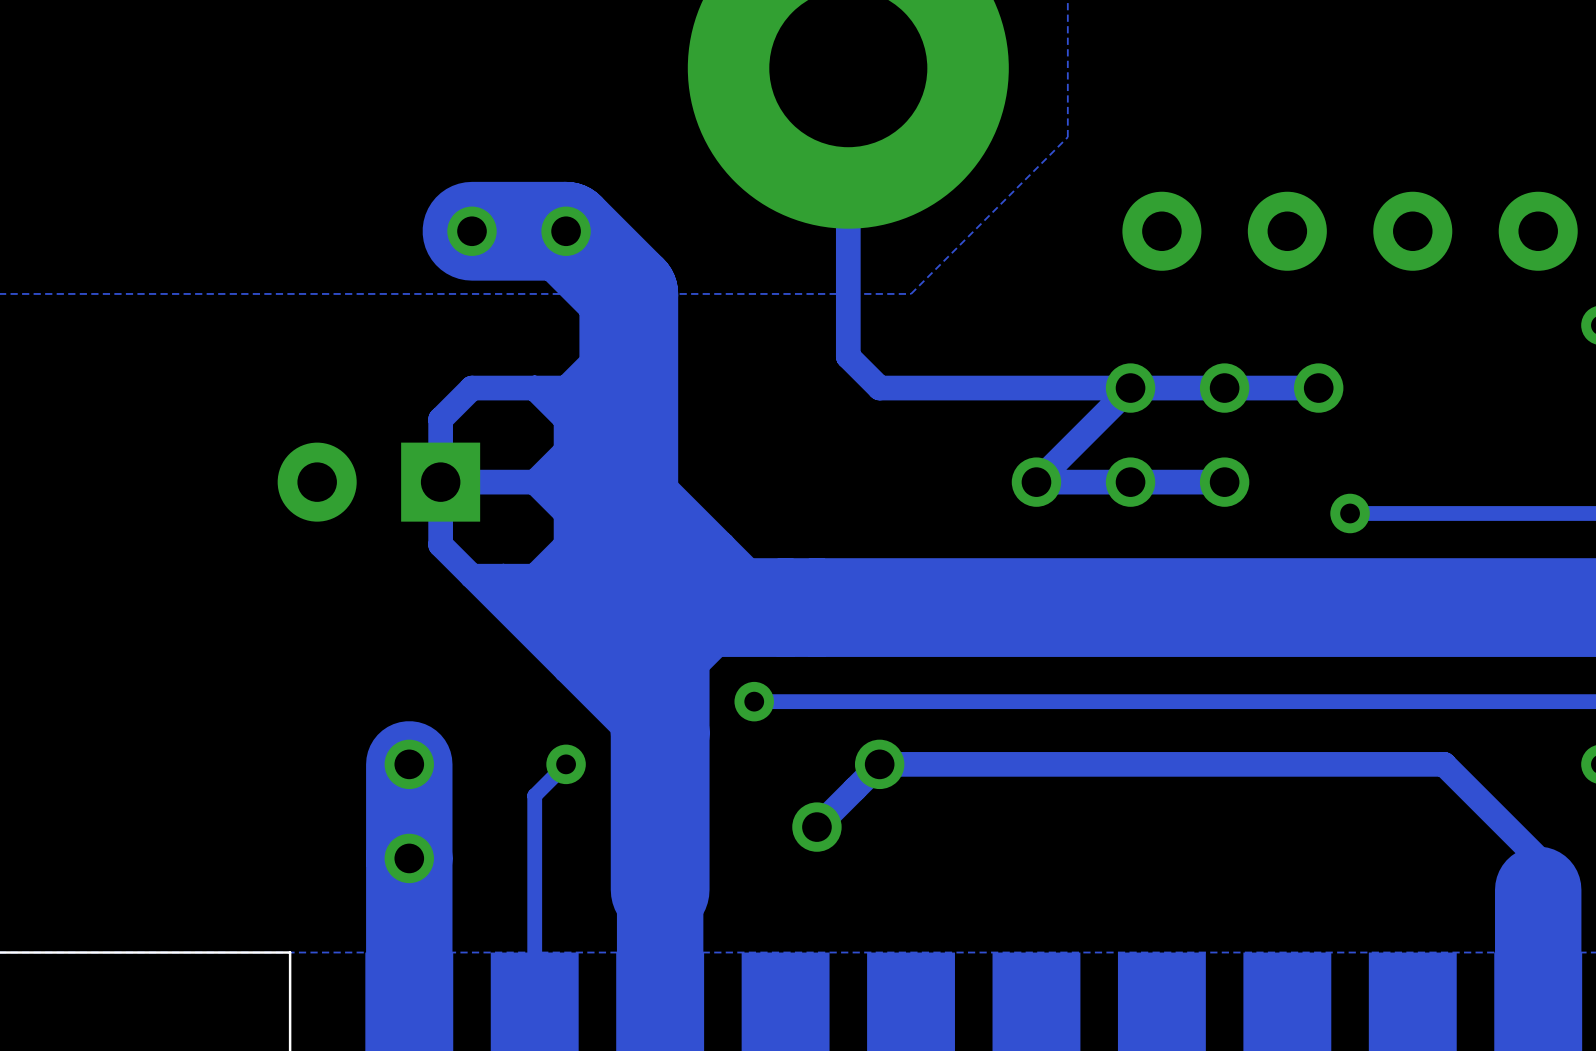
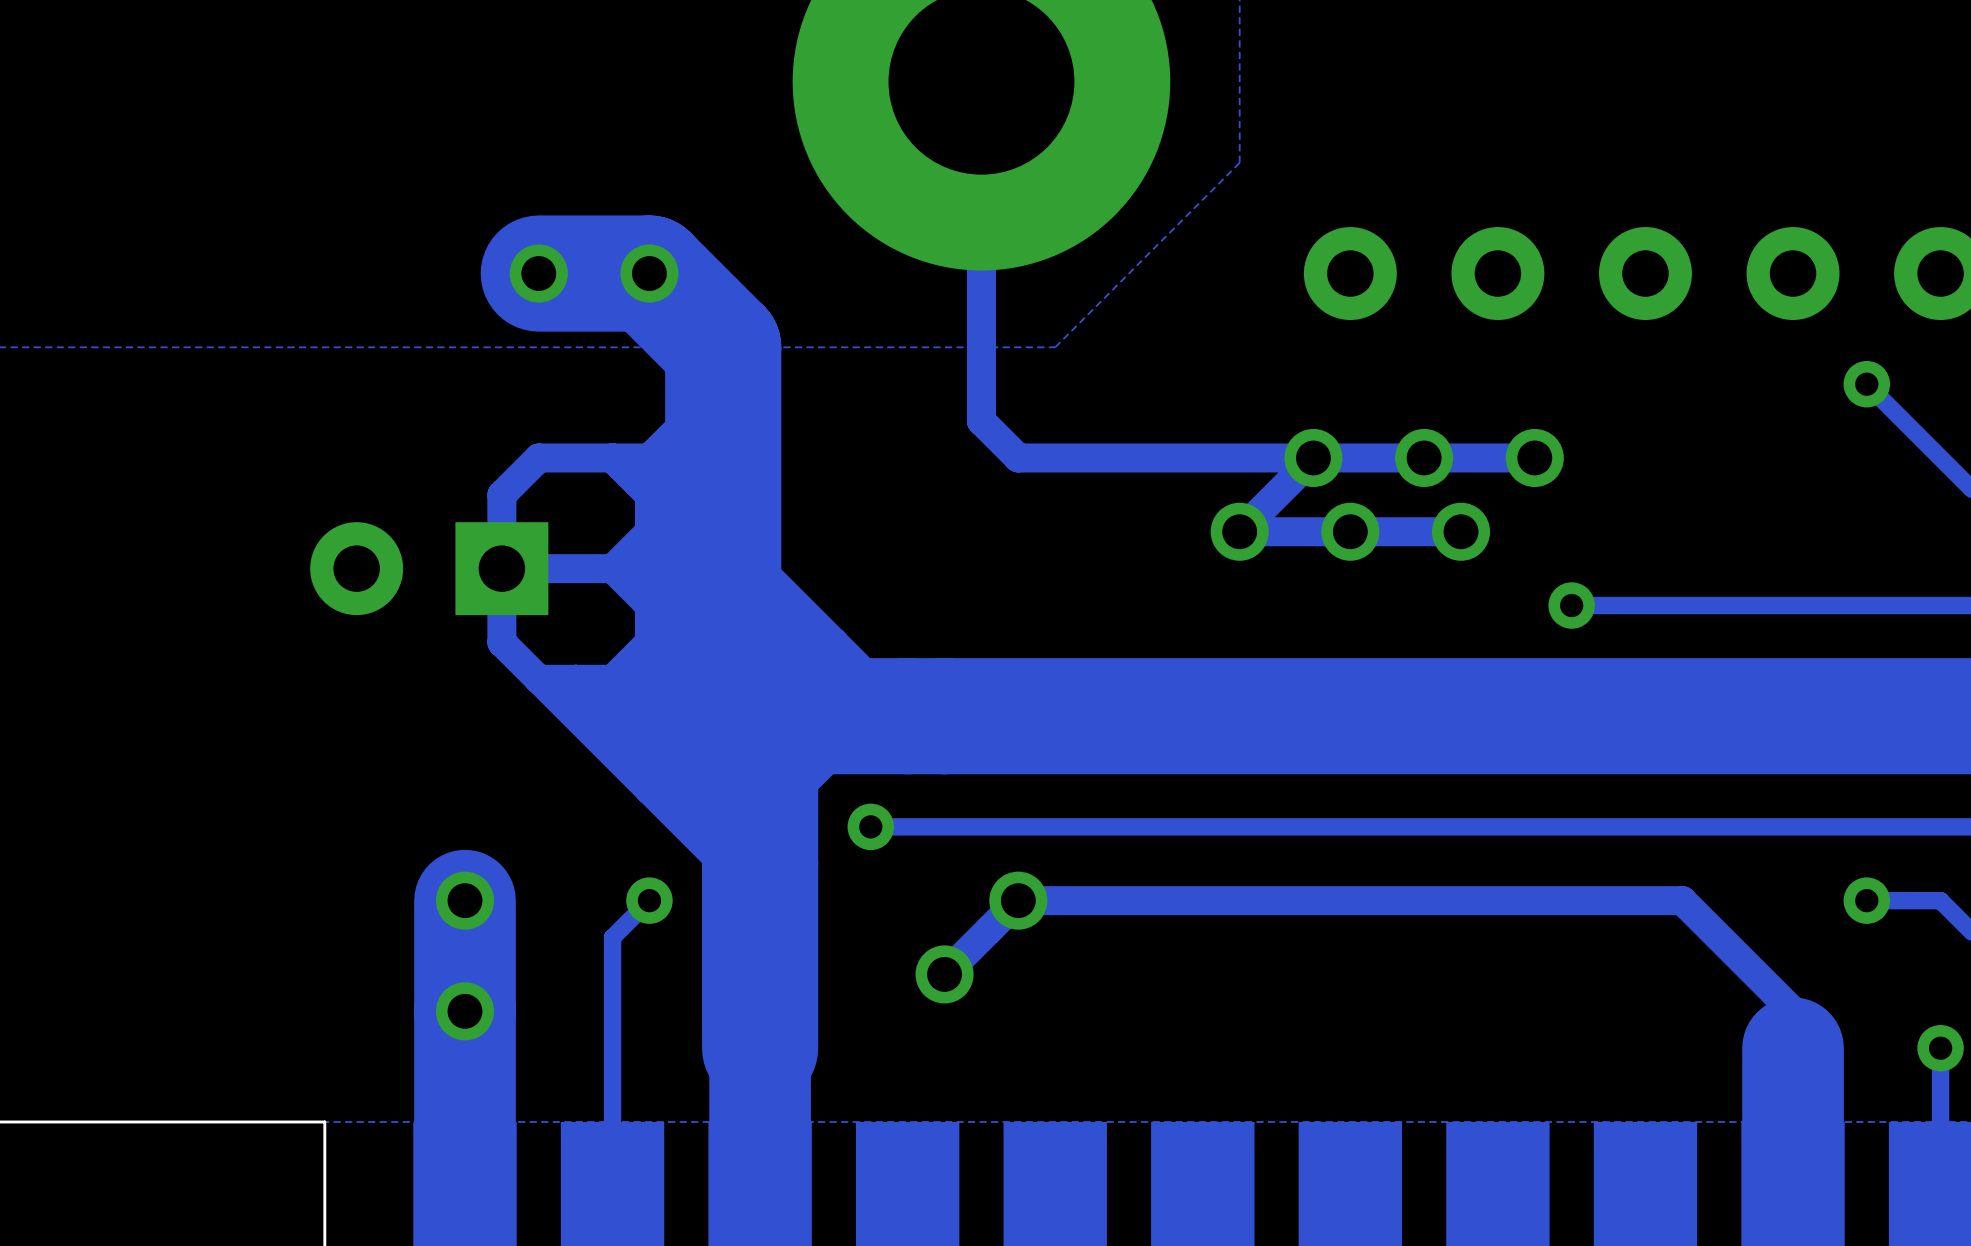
track: (1067, 450) (1036, 482) (1224, 482) -> (1239, 531) (1461, 531)
via position: (1036, 482) -> (1239, 531)
via position: (1130, 482) -> (1350, 531)
via position: (1224, 482) -> (1461, 531)

